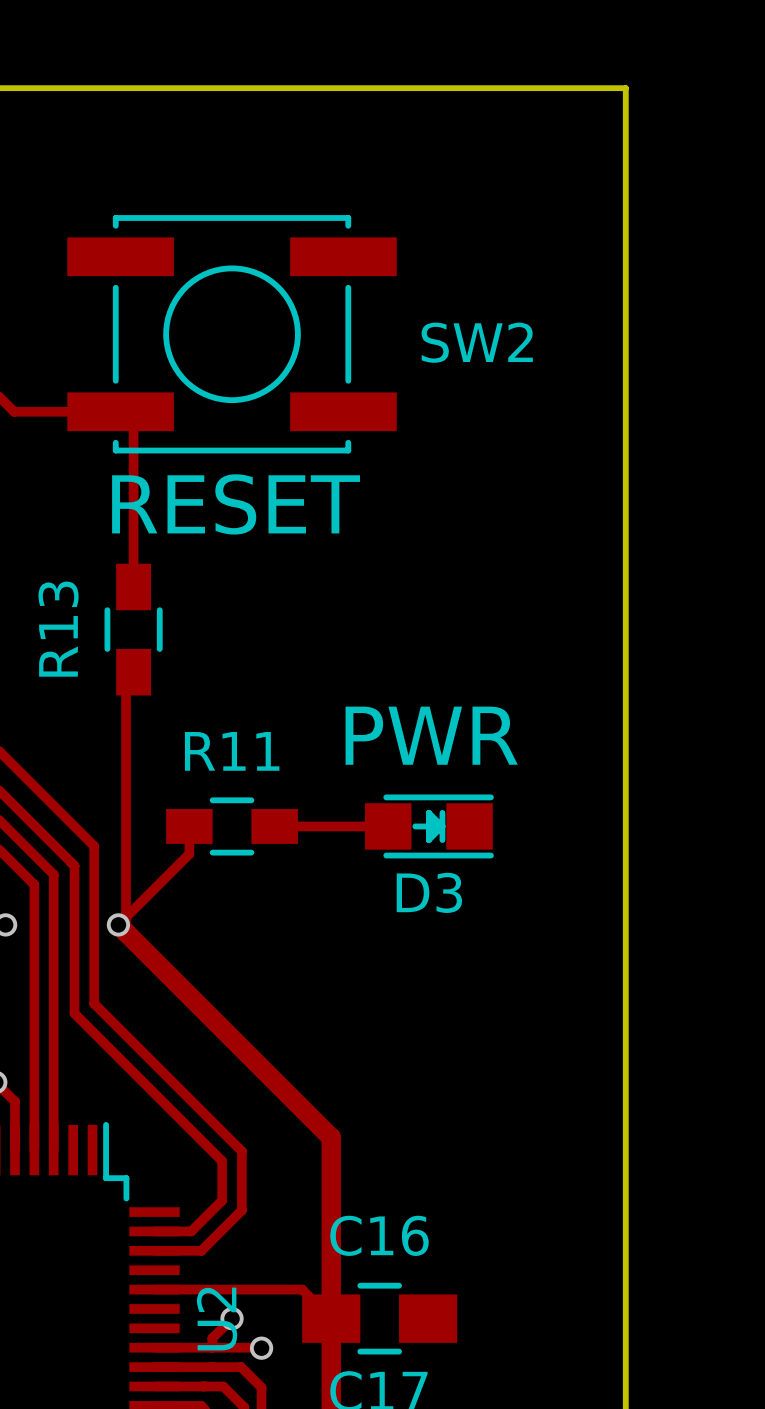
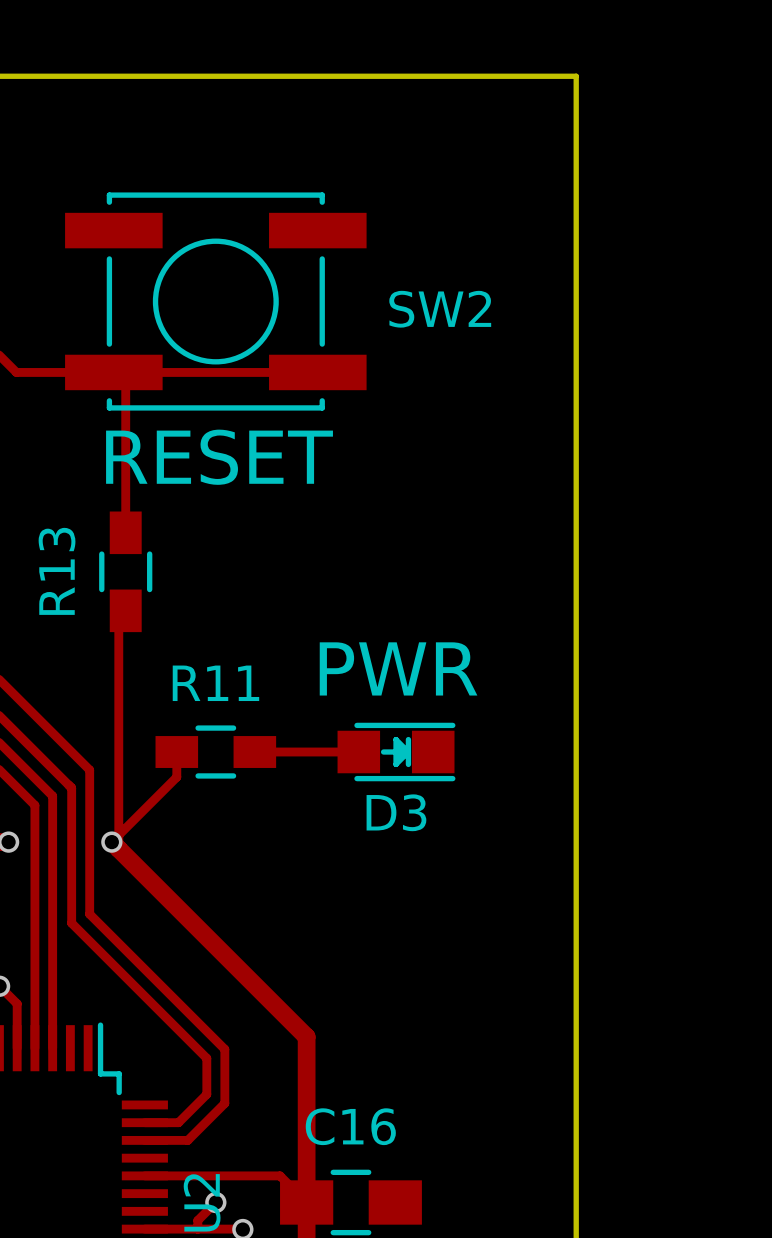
track: none -> (113, 372) (317, 372)

